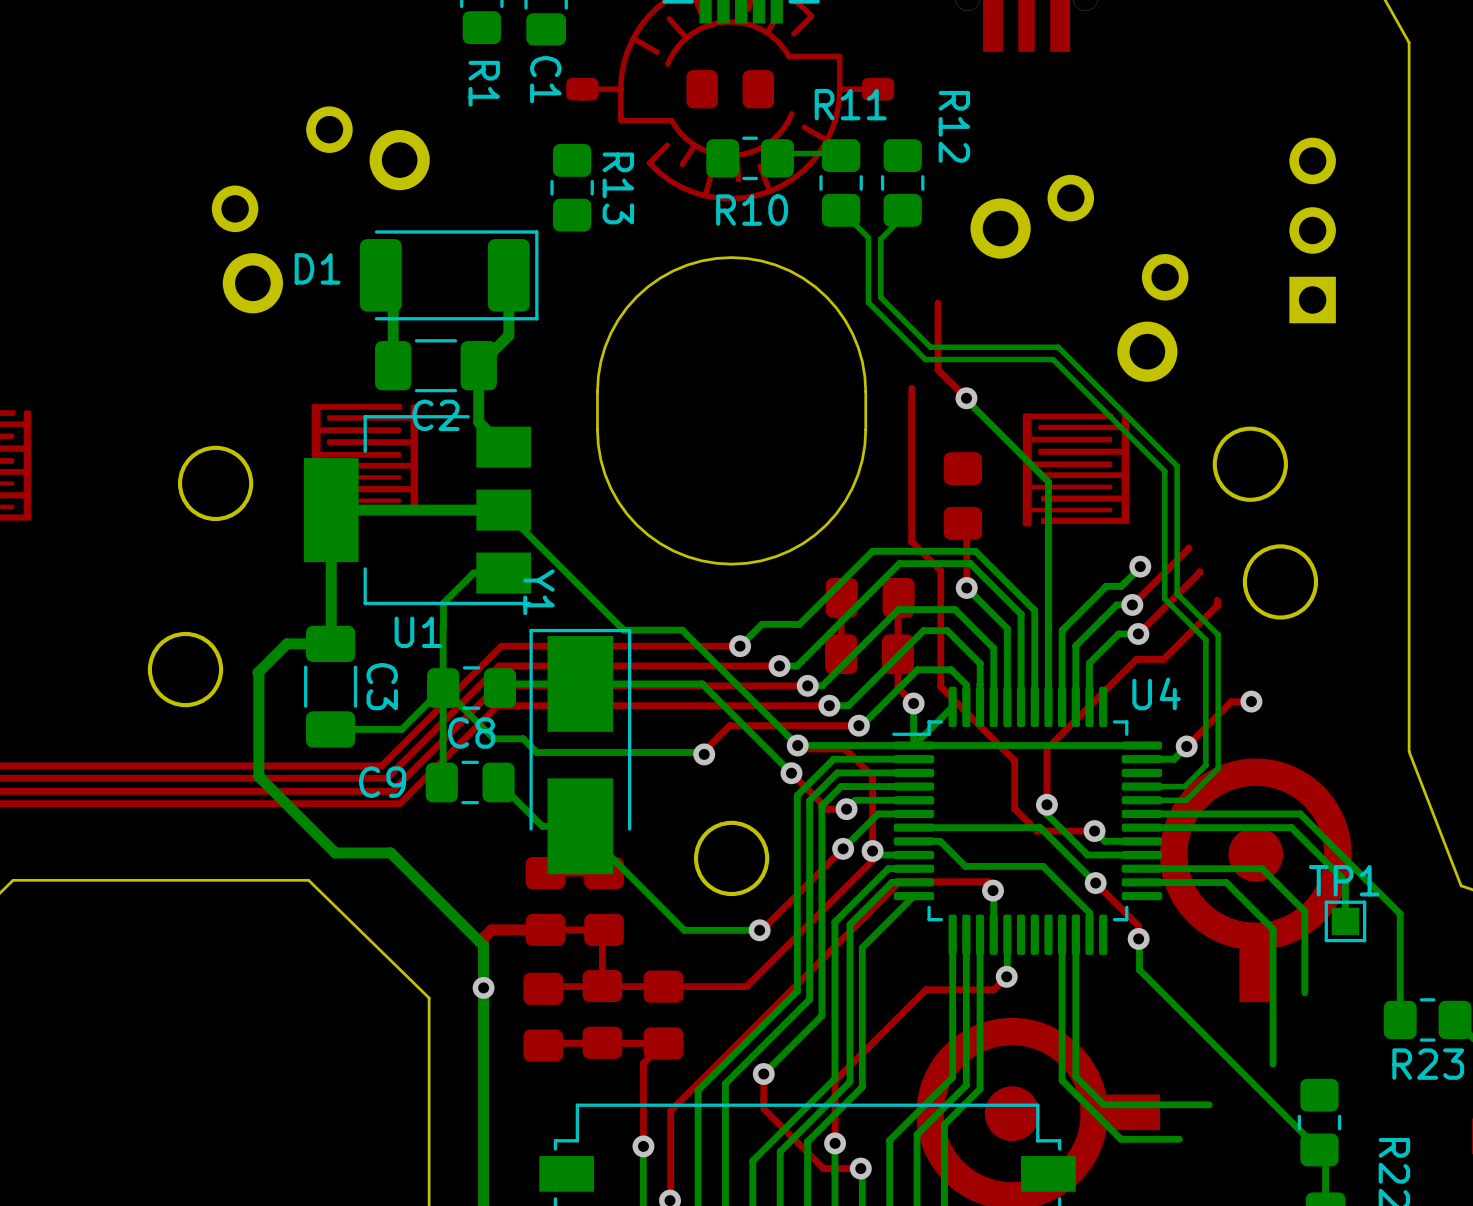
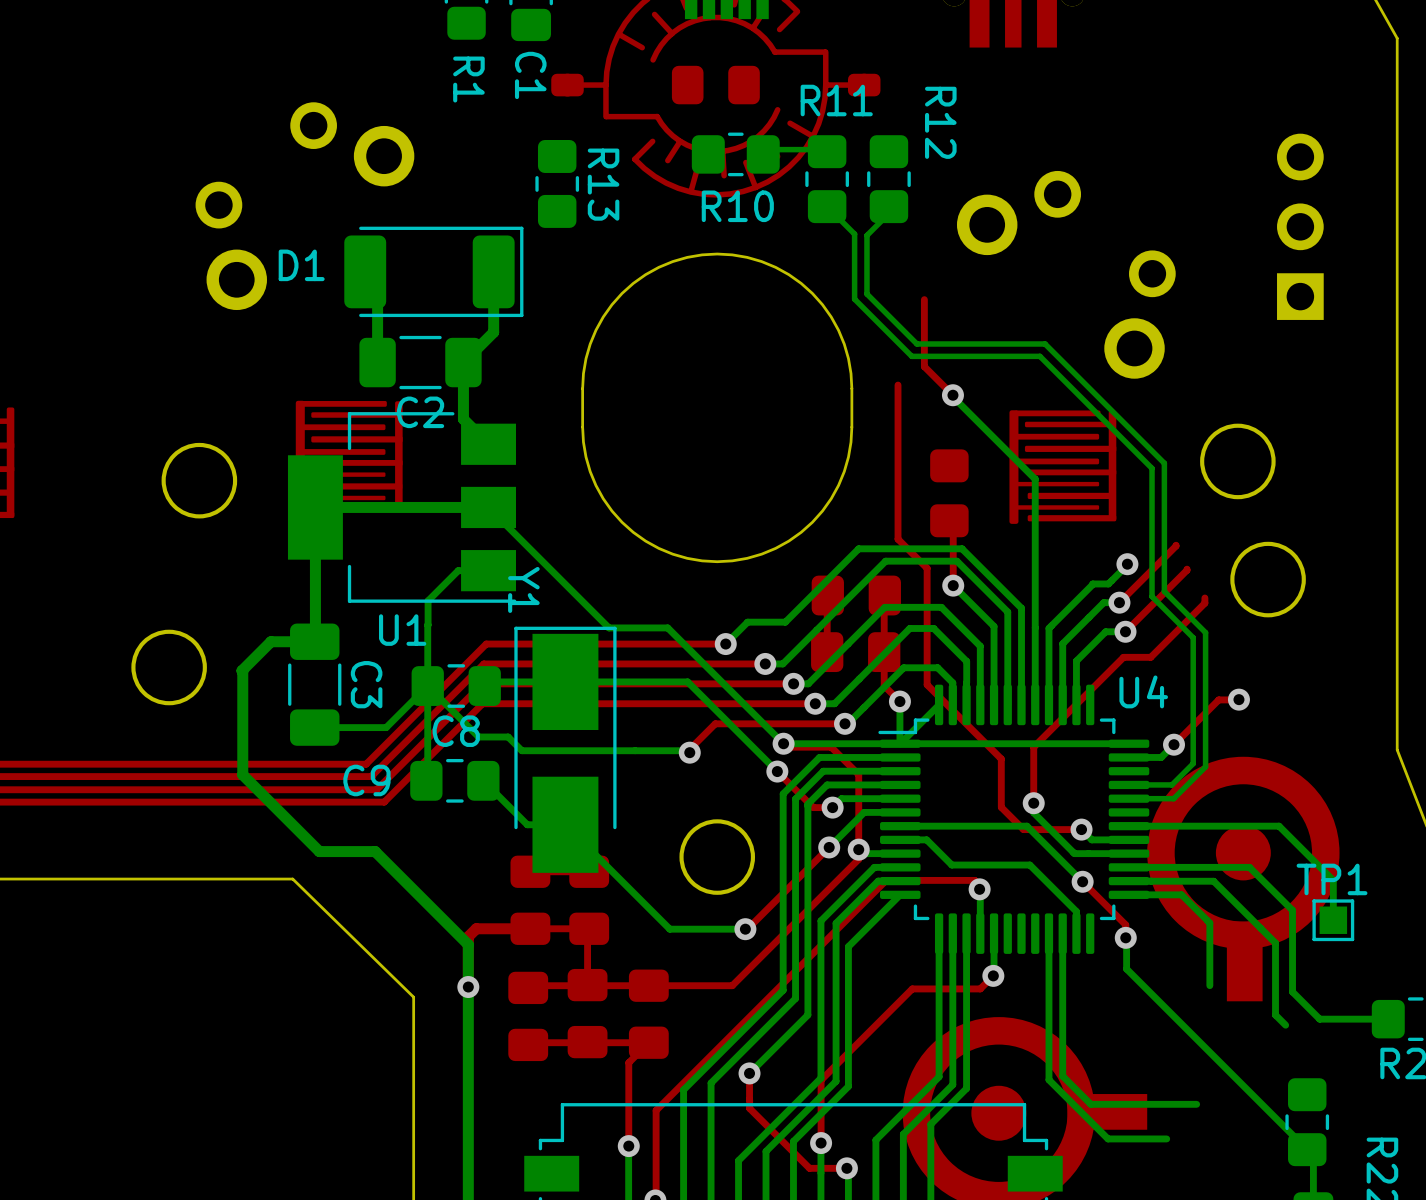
bottom track: (1141, 813) (1300, 813) (1400, 913) (1400, 1019) -> (1292, 991) (1319, 1019) (1388, 1019)
bottom track: none -> (1129, 894) (1181, 894) (1209, 923) (1209, 985)
bottom track: (1273, 929) (1273, 1064) -> (1260, 928) (1275, 943) (1275, 1015) (1285, 1025)

